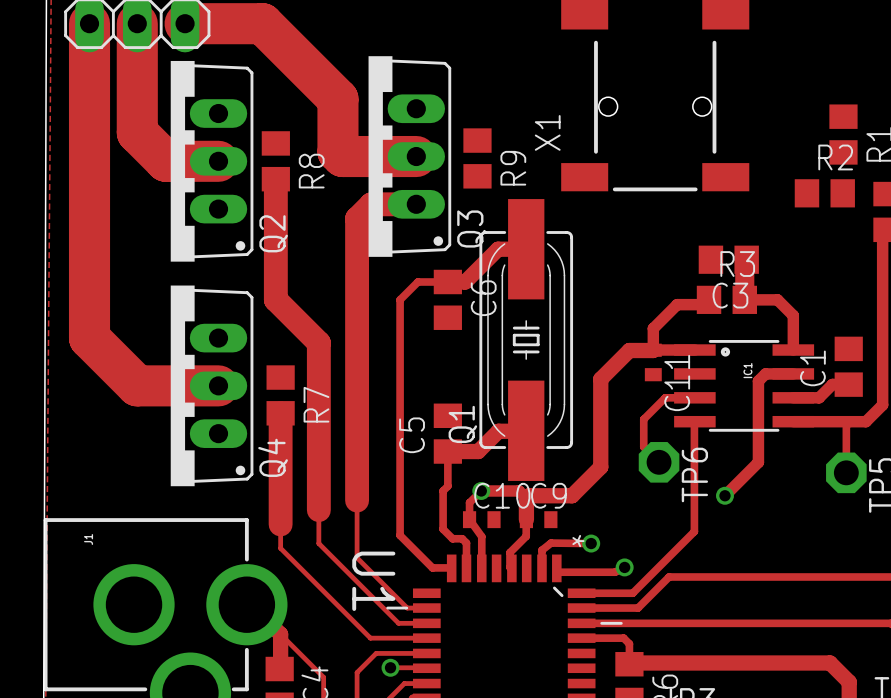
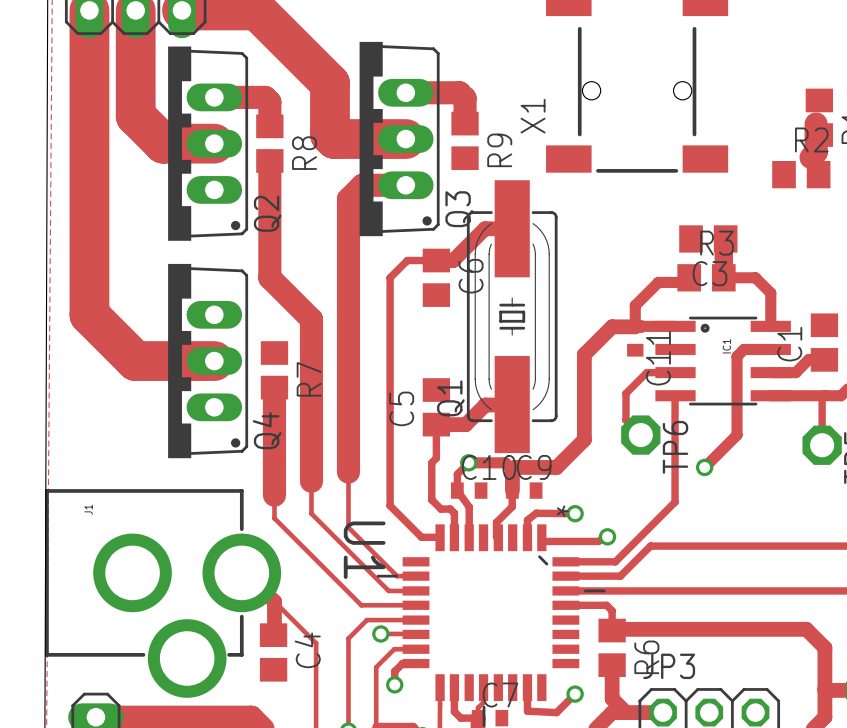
track: none -> (405, 92) (459, 92) (465, 98) (465, 123)
track: none -> (214, 97) (265, 97) (269, 102) (269, 126)
track: none -> (816, 123) (816, 152) (811, 157)

